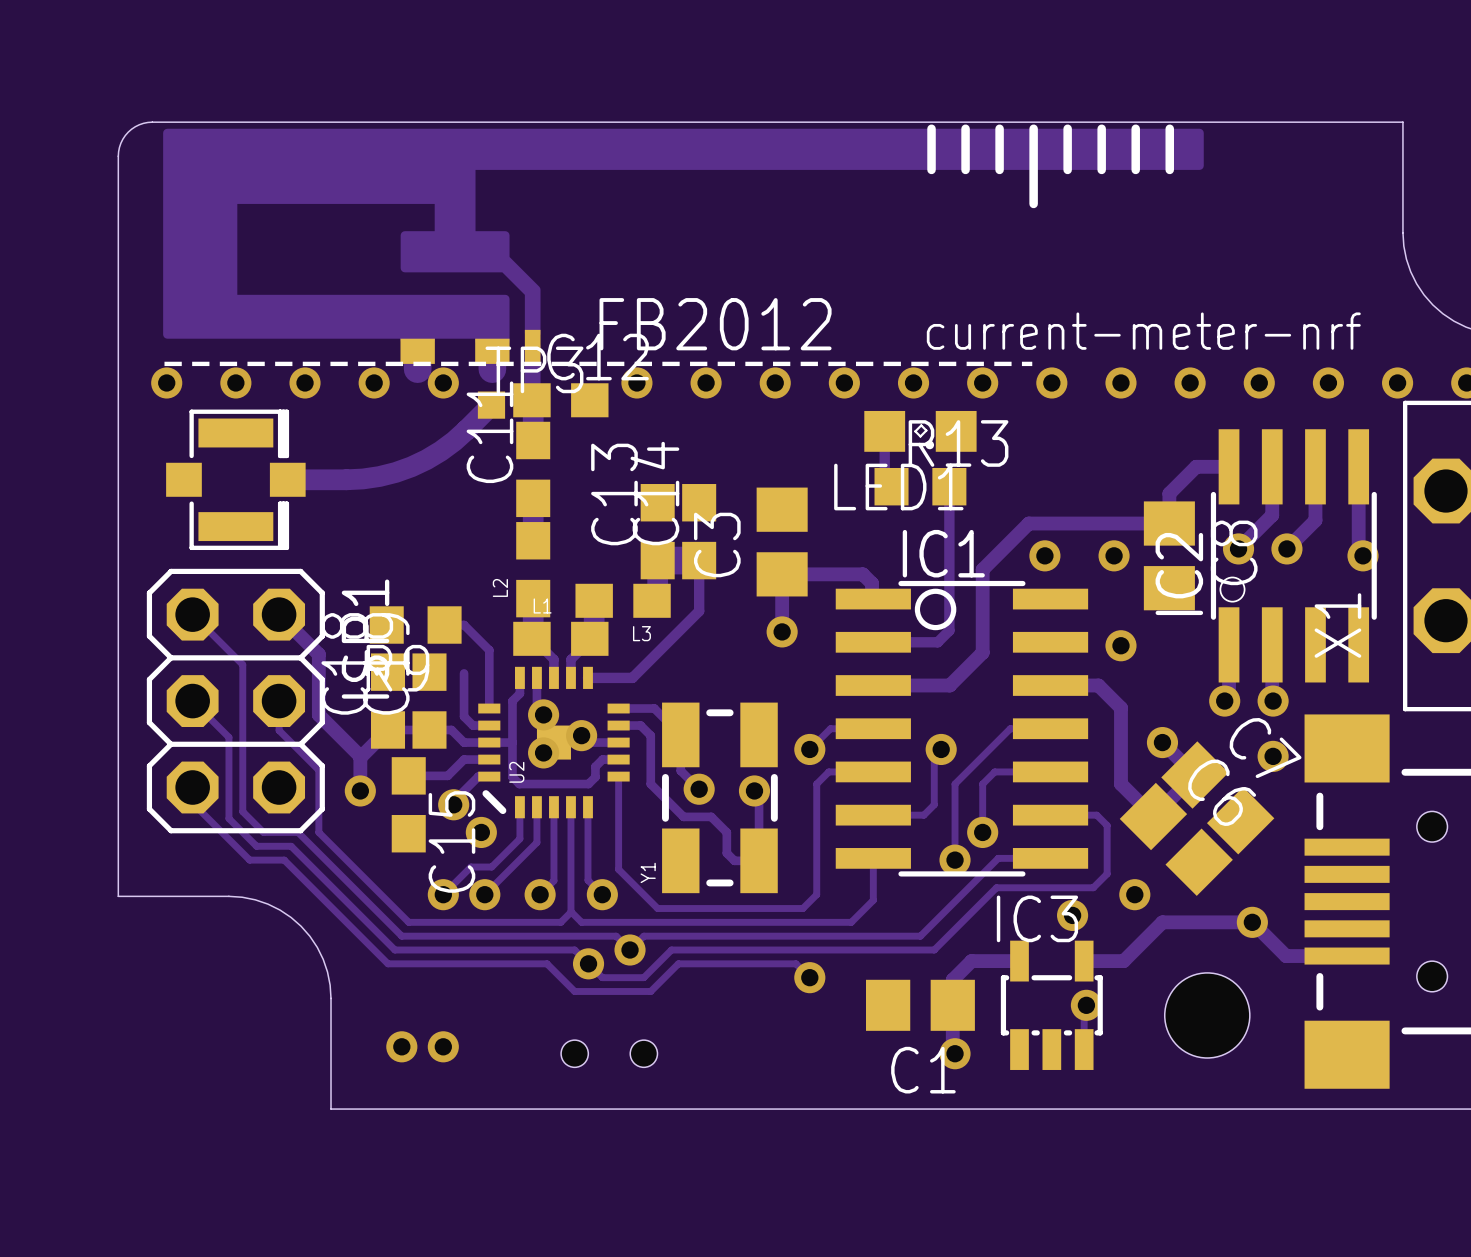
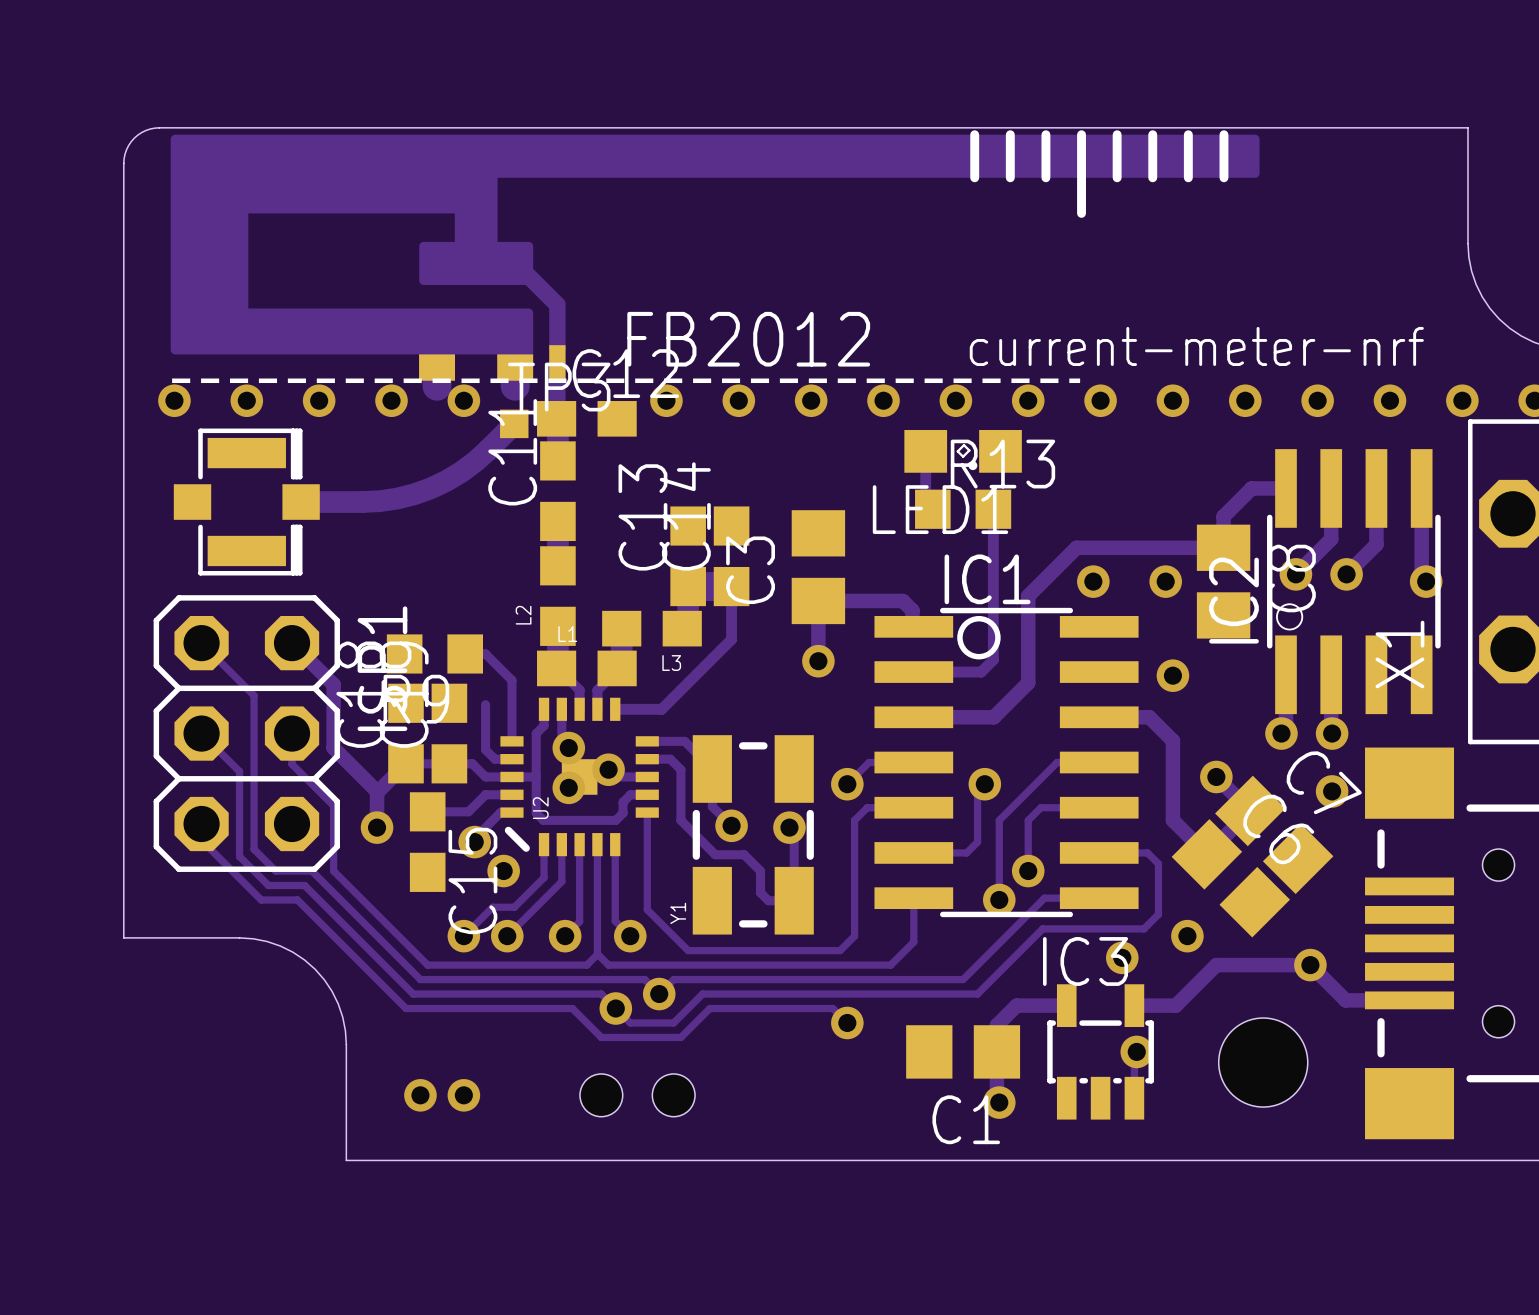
hole size: [561, 1040, 589, 1068] -> [579, 1073, 623, 1117]
hole size: [630, 1040, 658, 1068] -> [652, 1073, 696, 1117]

